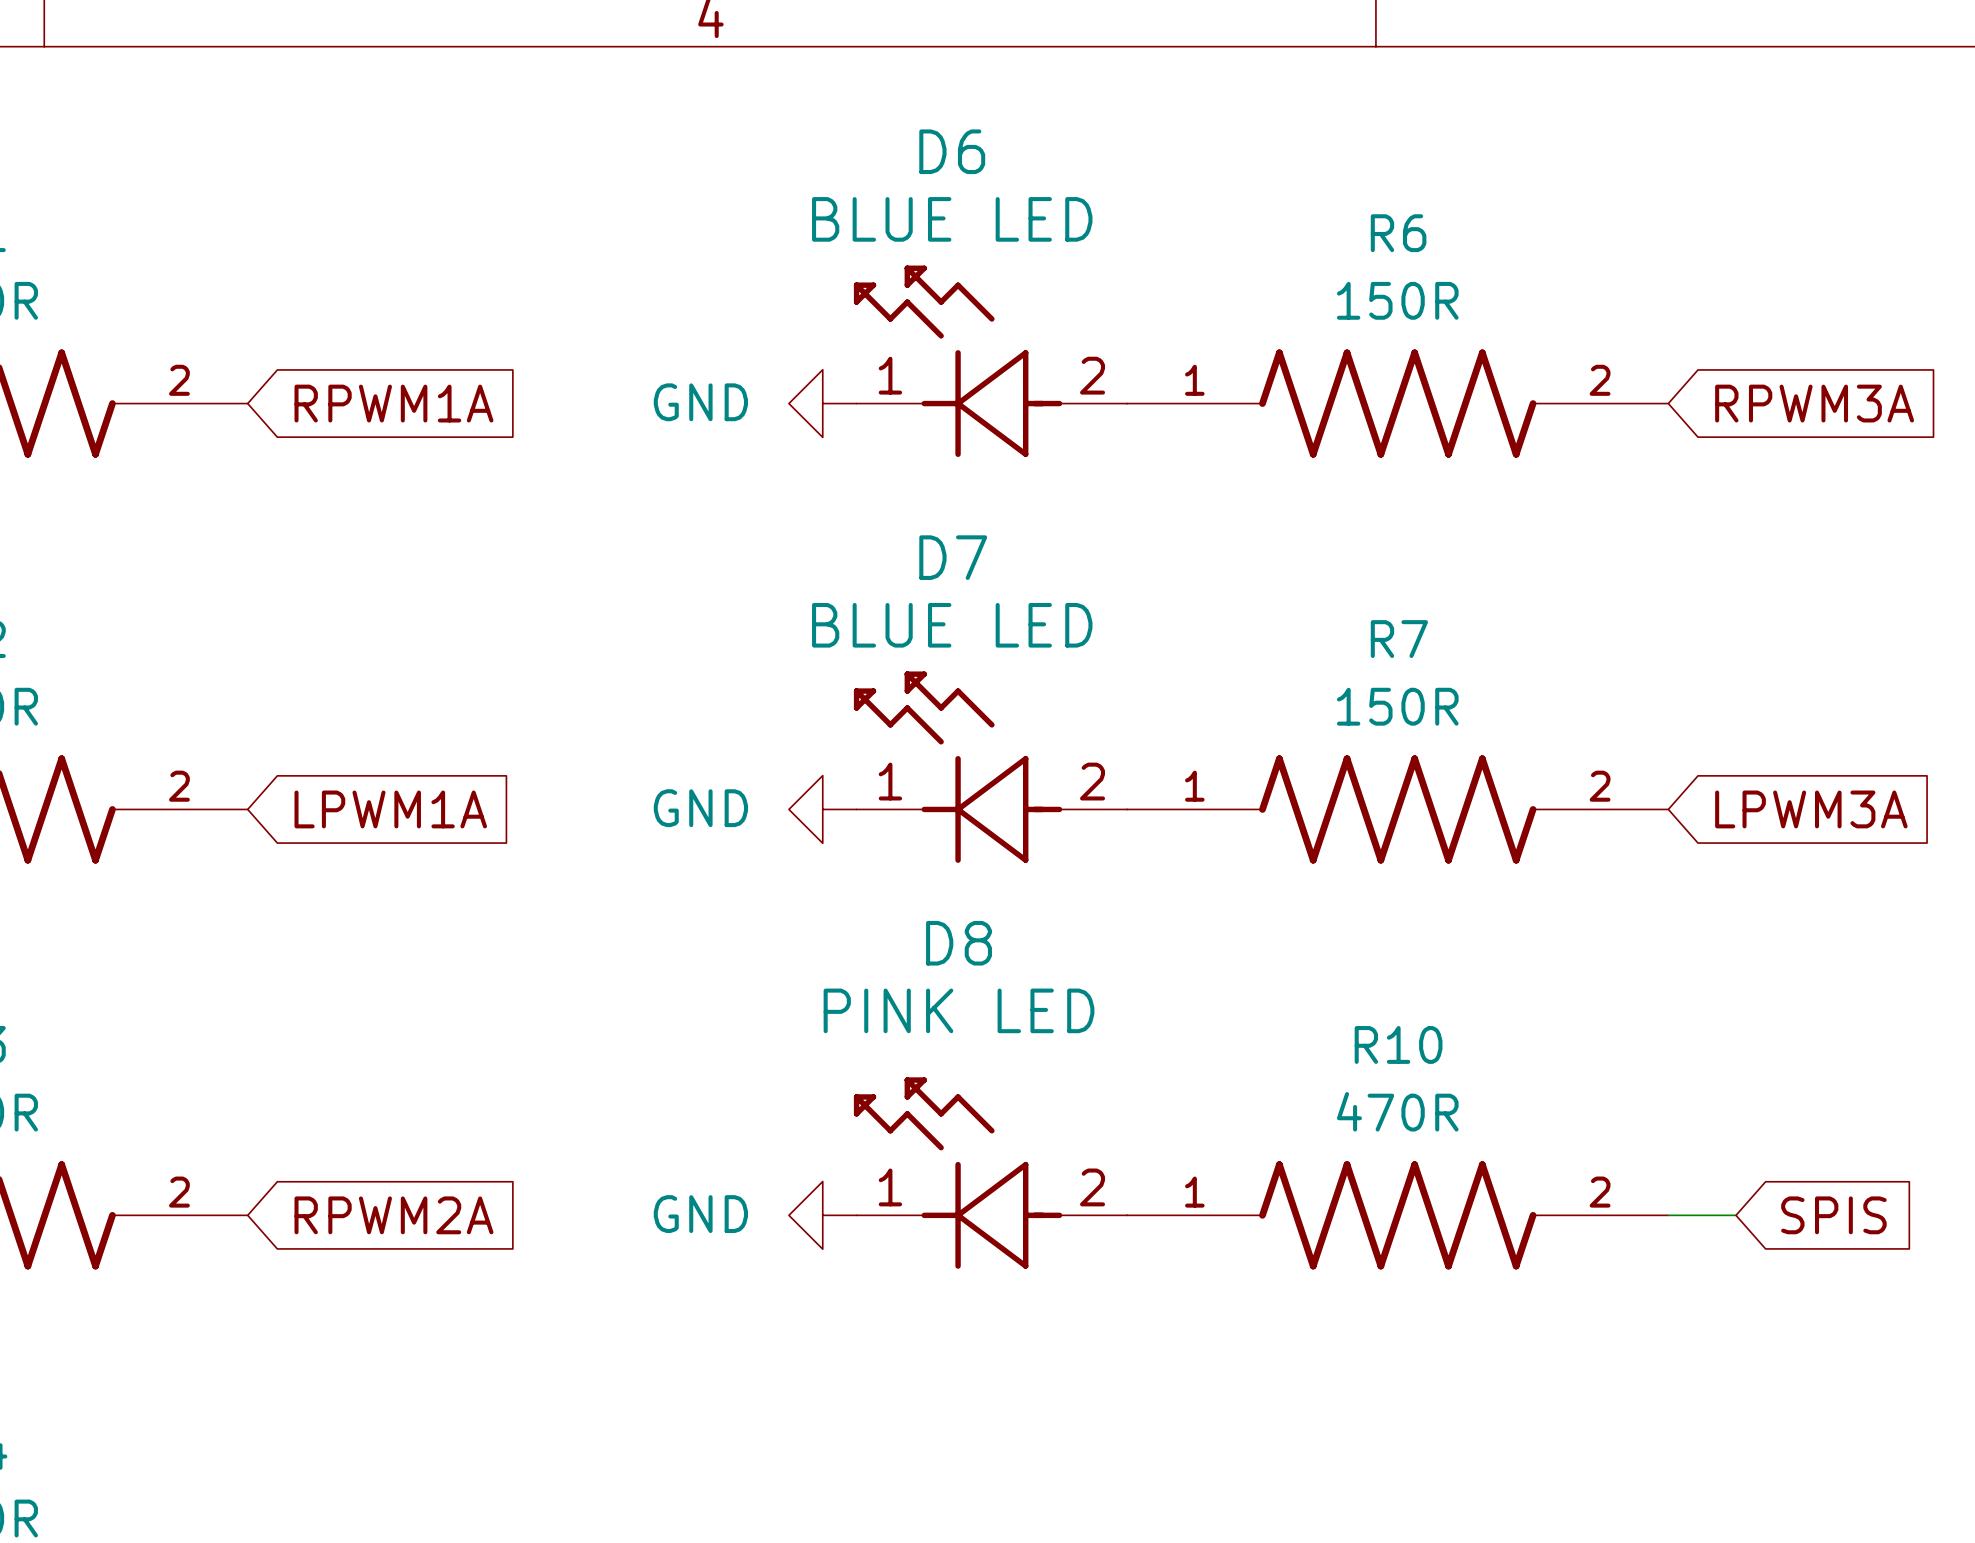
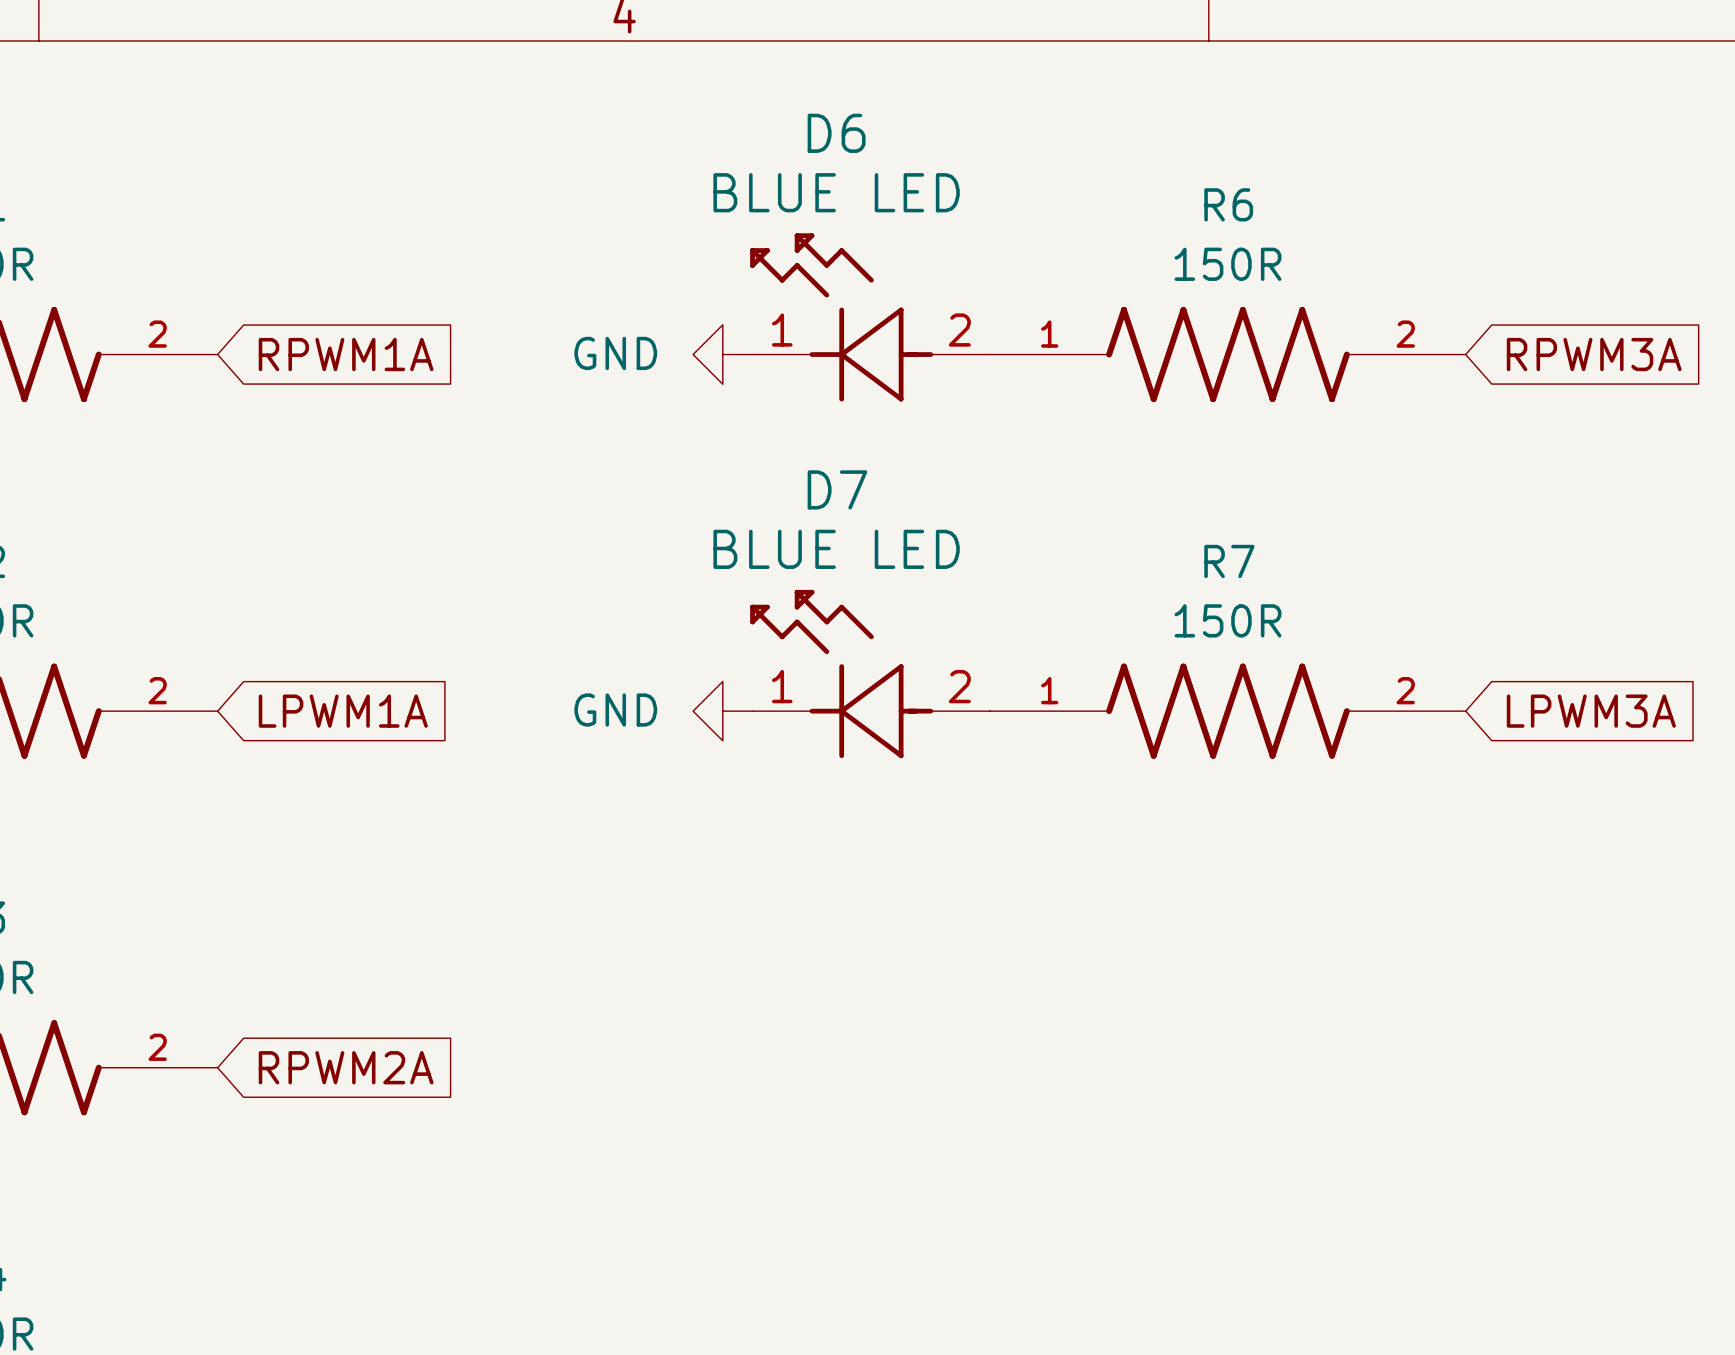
D8: PINK LED (990, 1173) -> none
power symbol: GND (822, 1215) -> none
R10: 470R (1397, 1215) -> none
wire: (1668, 1215) (1736, 1215) -> none
global label: SPIS (1833, 1215) -> none

